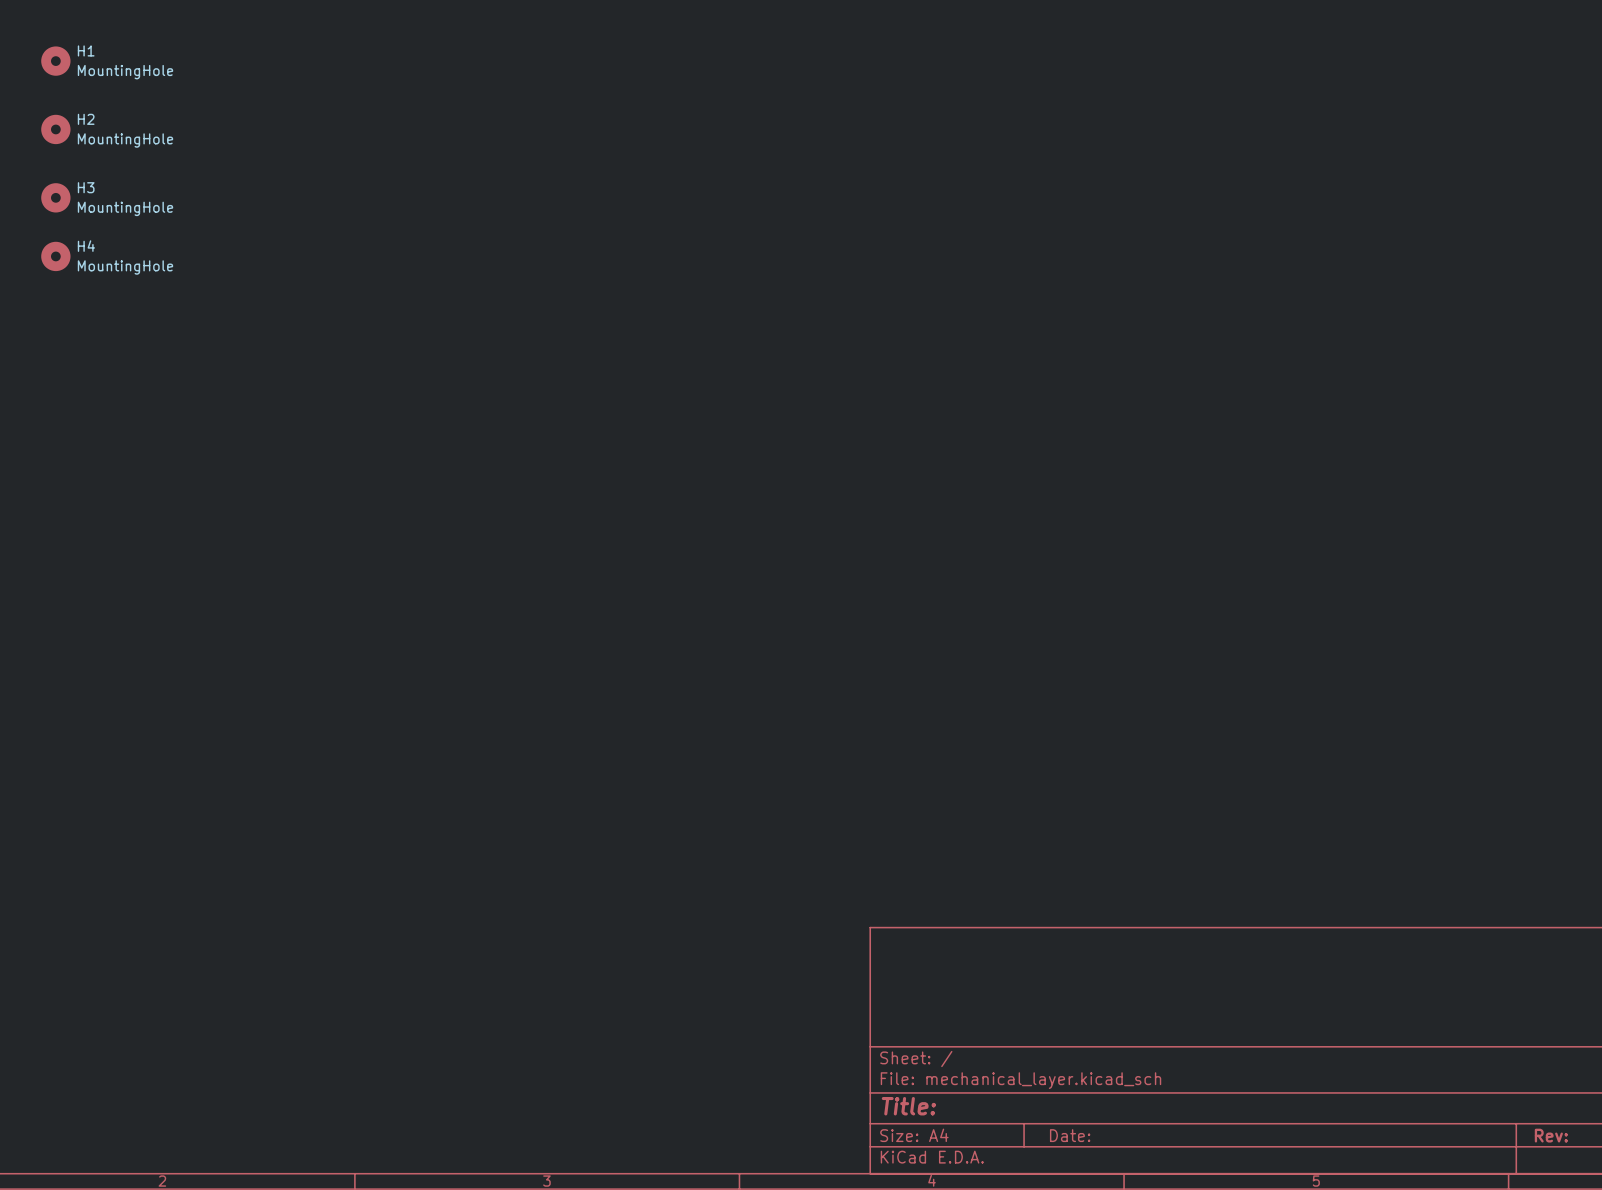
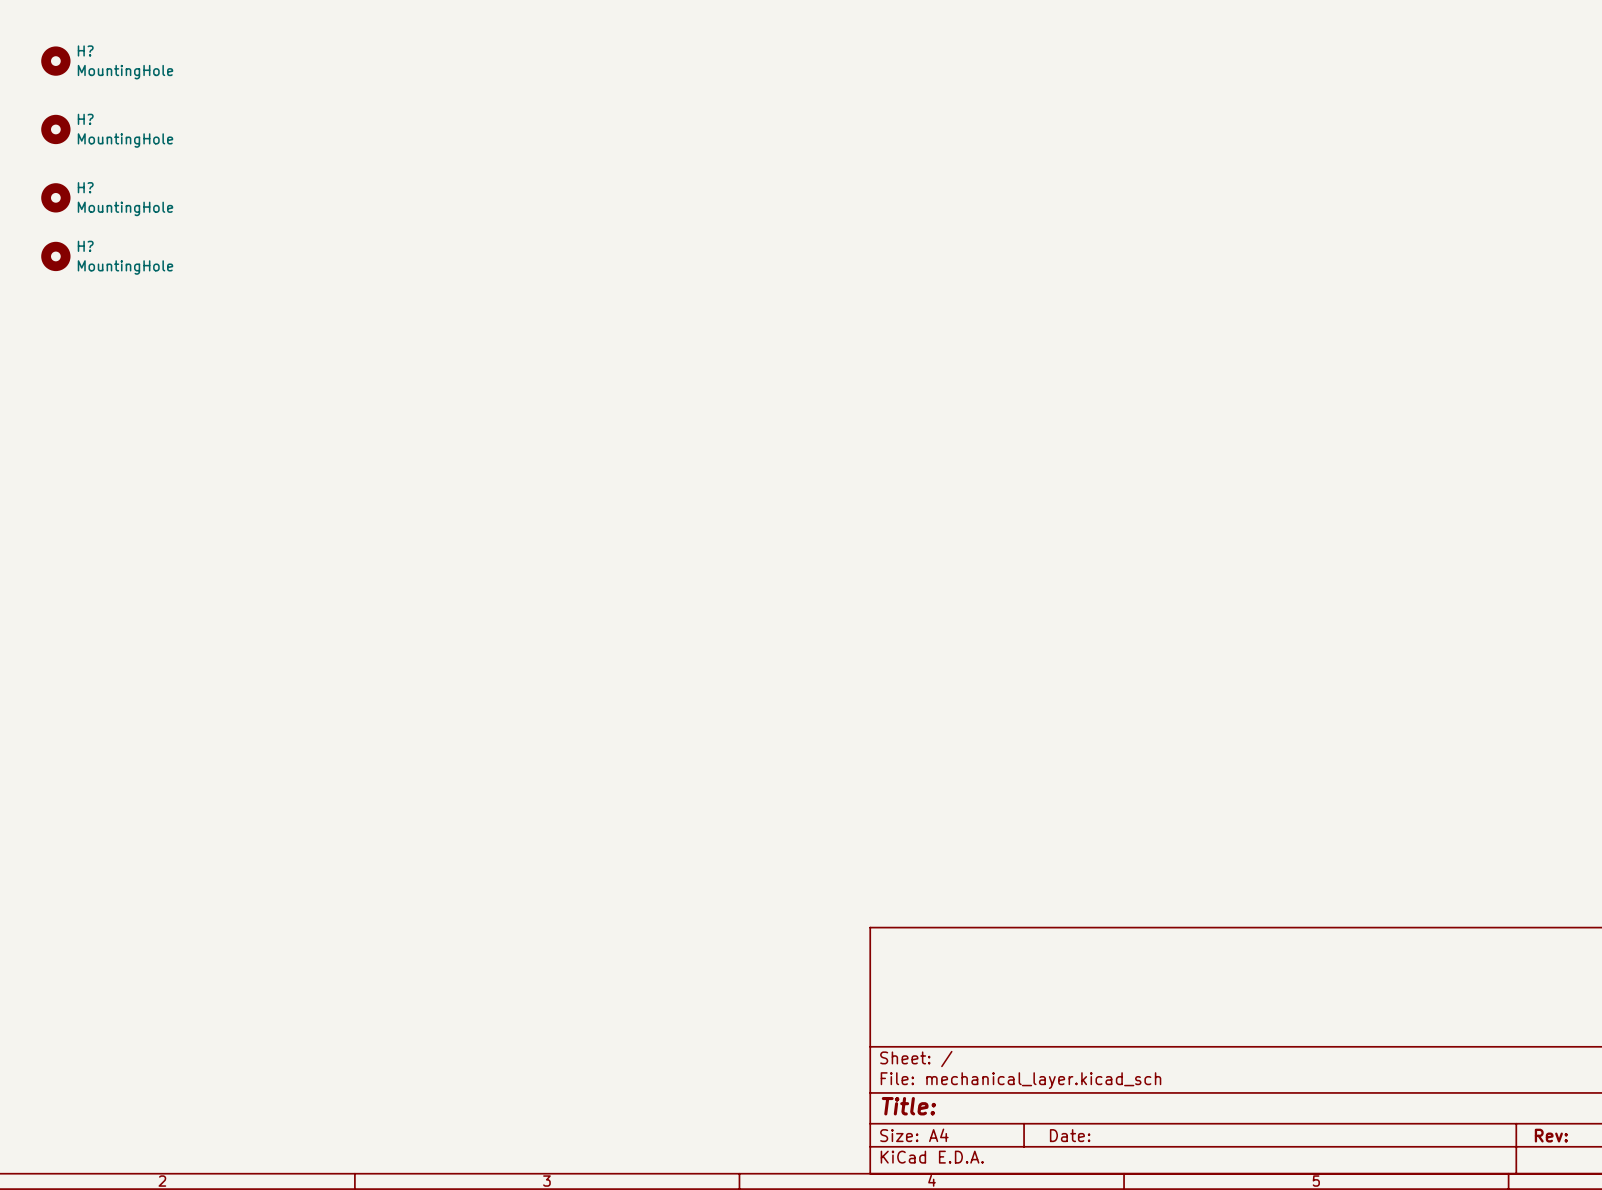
H1 name: H1 (86, 50) -> H? (85, 50)
H2 name: H2 (86, 119) -> H? (85, 119)
H3 name: H3 (86, 187) -> H? (85, 187)
H4 name: H4 (86, 246) -> H? (85, 246)

